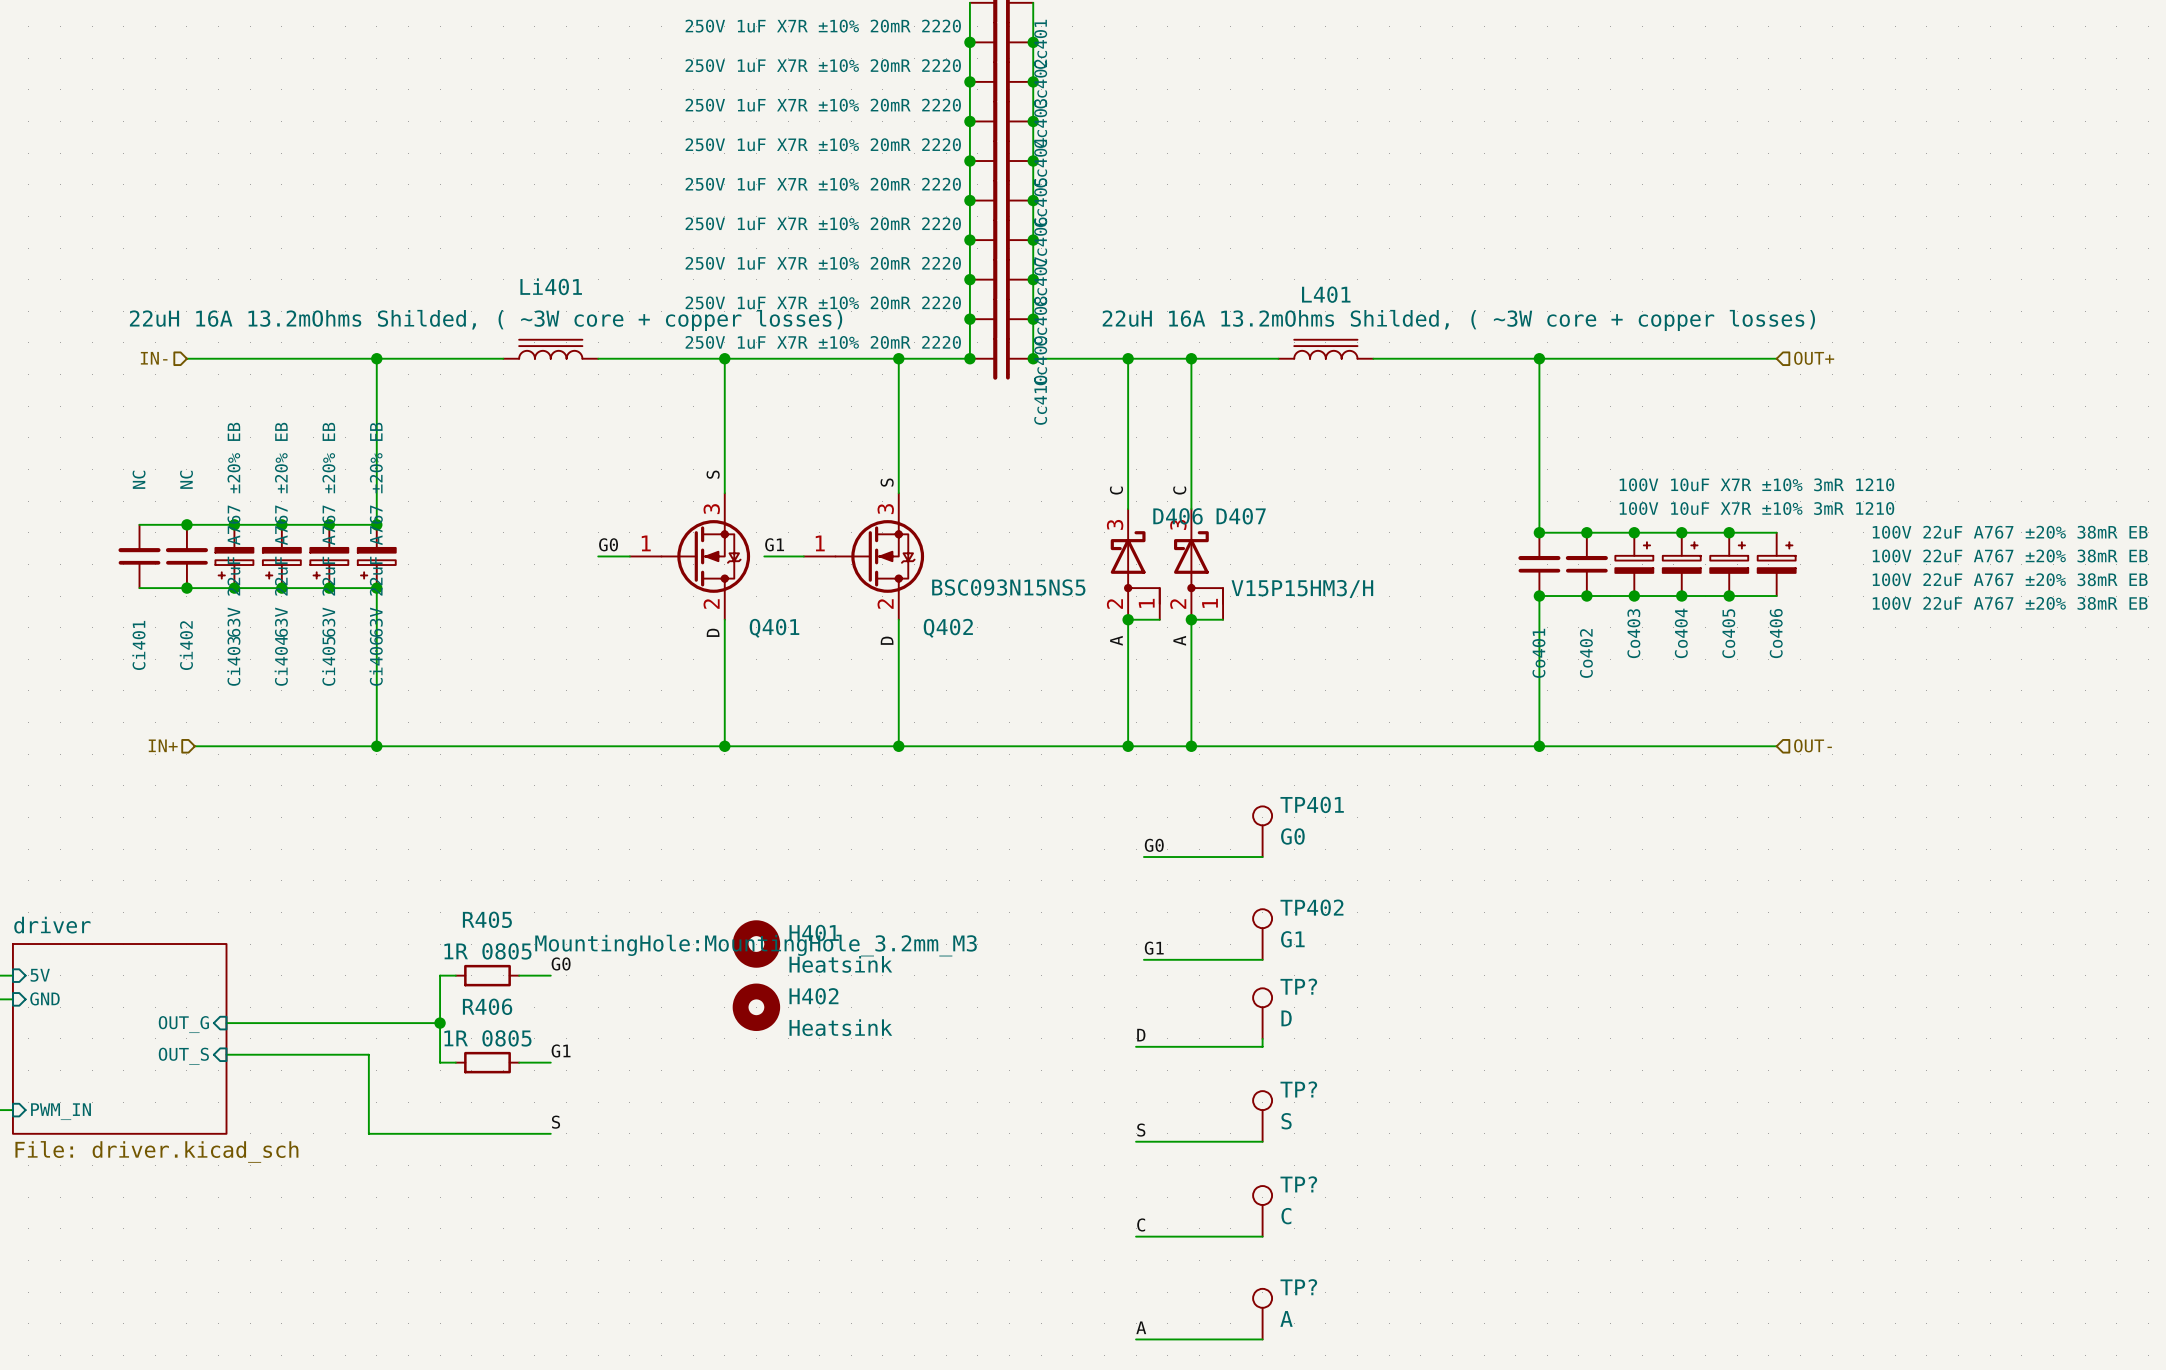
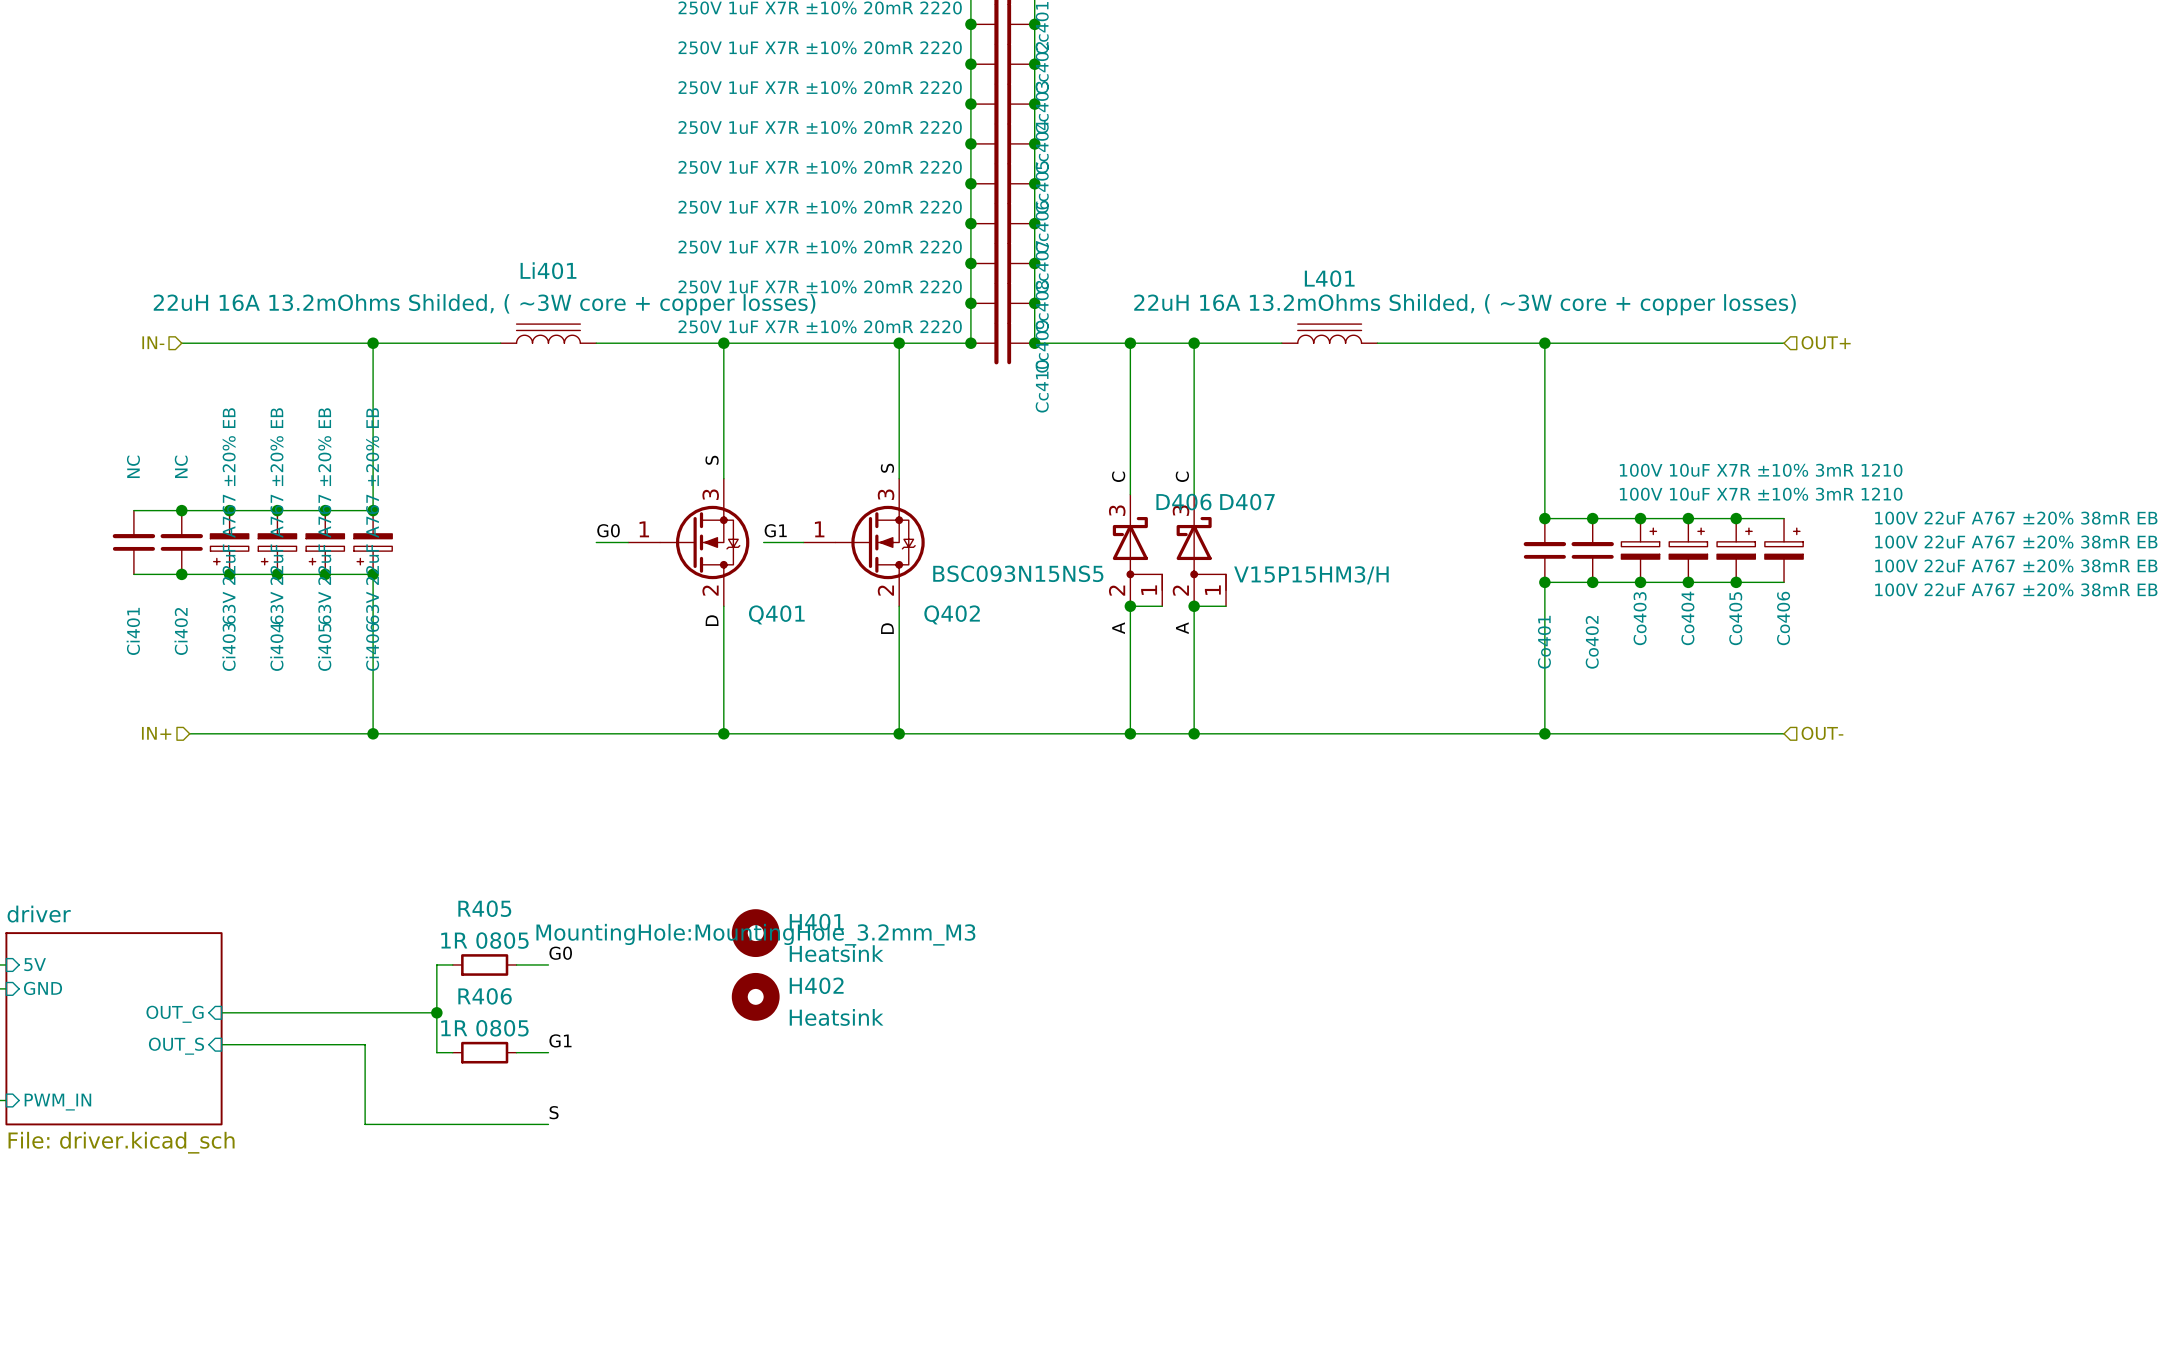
TP401: G0 (1262, 831) -> none
label: G0 (1154, 845) -> none
wire: (1143, 857) (1262, 857) -> none
TP402: G1 (1262, 934) -> none
label: G1 (1154, 948) -> none
wire: (1143, 959) (1262, 959) -> none
TP?: D (1262, 1013) -> none
label: D (1141, 1035) -> none
wire: (1262, 1038) (1262, 1046) (1136, 1046) -> none
TP?: S (1262, 1116) -> none
label: S (1141, 1130) -> none
wire: (1136, 1141) (1262, 1141) -> none
TP?: C (1262, 1211) -> none
label: C (1141, 1224) -> none
wire: (1136, 1236) (1262, 1236) -> none
TP?: A (1262, 1314) -> none
label: A (1141, 1327) -> none
wire: (1136, 1339) (1262, 1339) -> none

